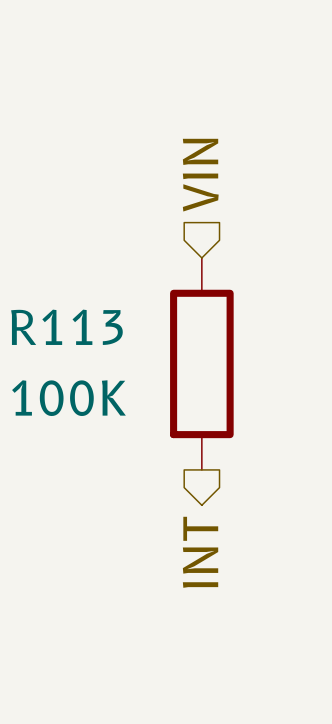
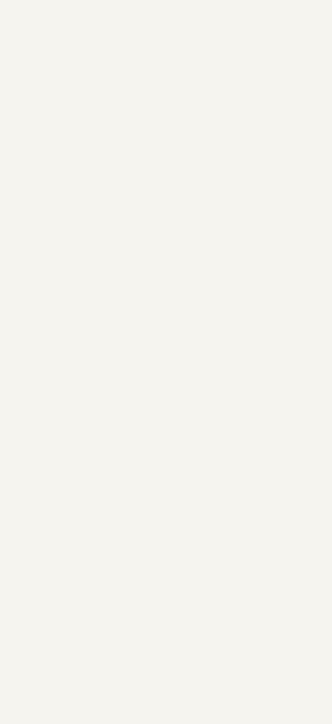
hierarchical label: VIN (200, 175) -> none
R113: 100K (201, 363) -> none
hierarchical label: INT (200, 552) -> none

